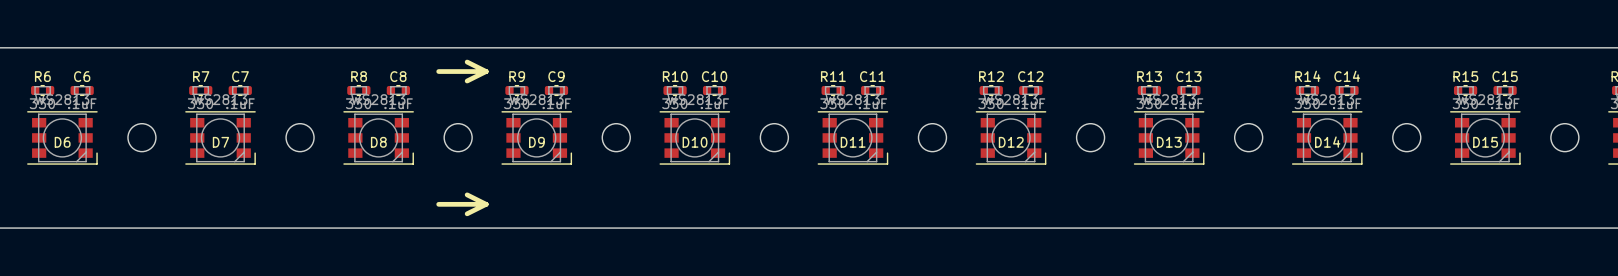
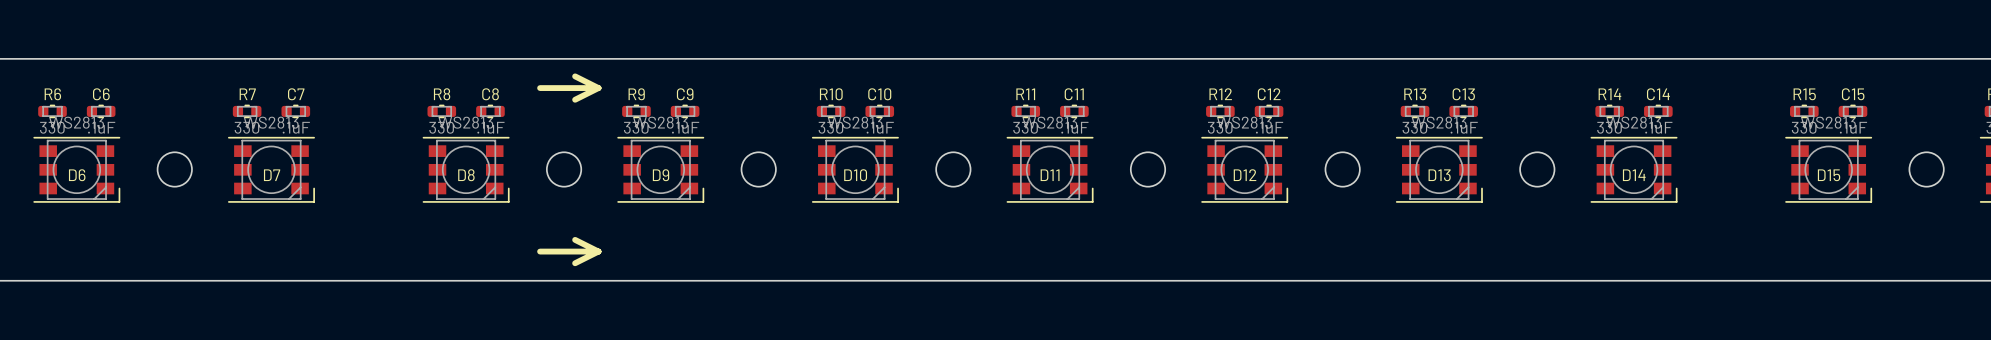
round board edge: [285, 123, 315, 153] -> none
round board edge: [1392, 123, 1422, 153] -> none

